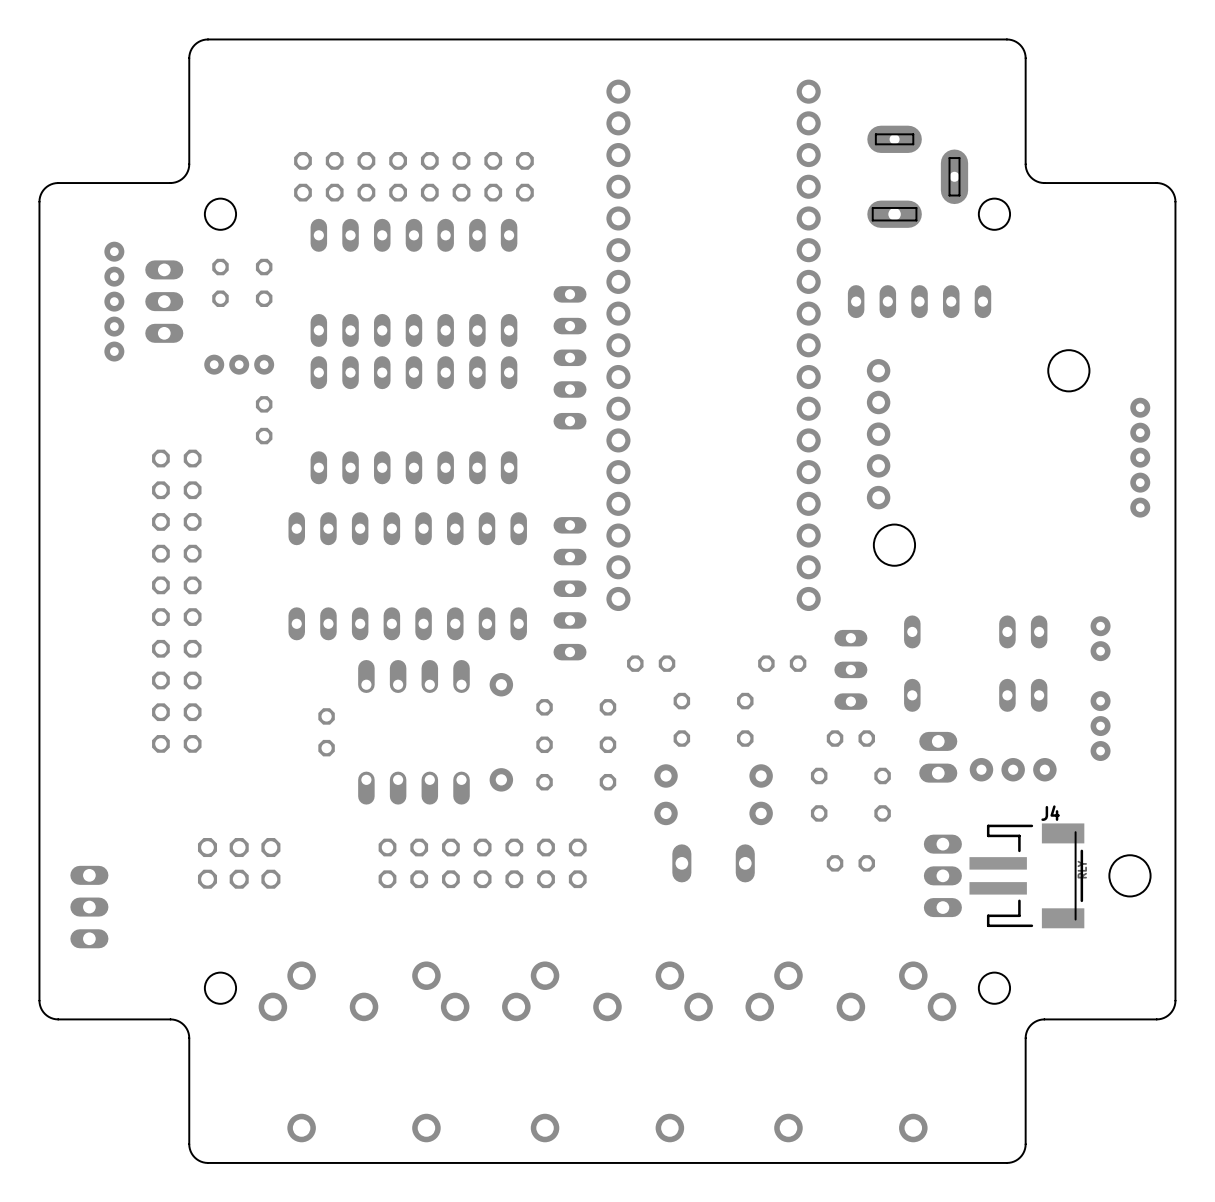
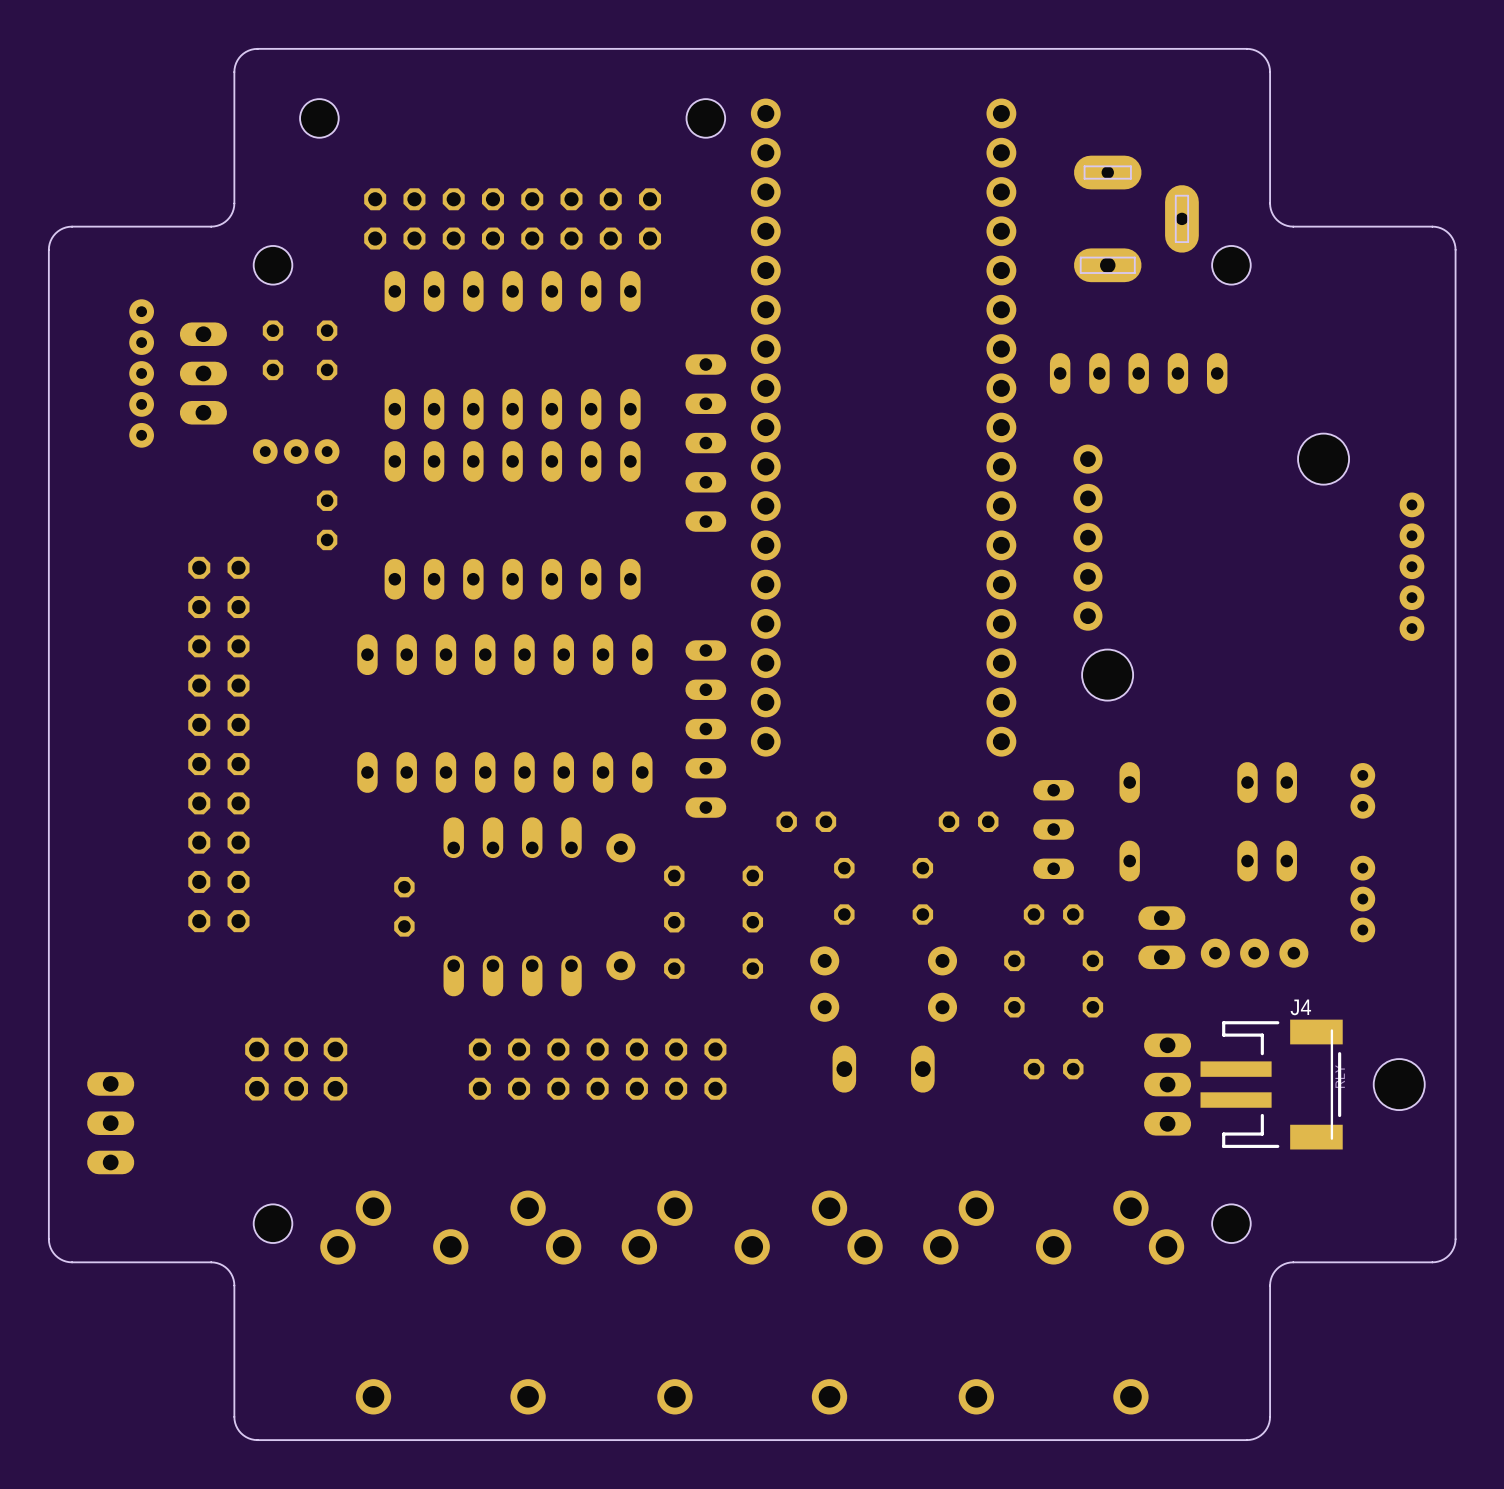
hole: none -> (319, 118)
hole: none -> (705, 118)

